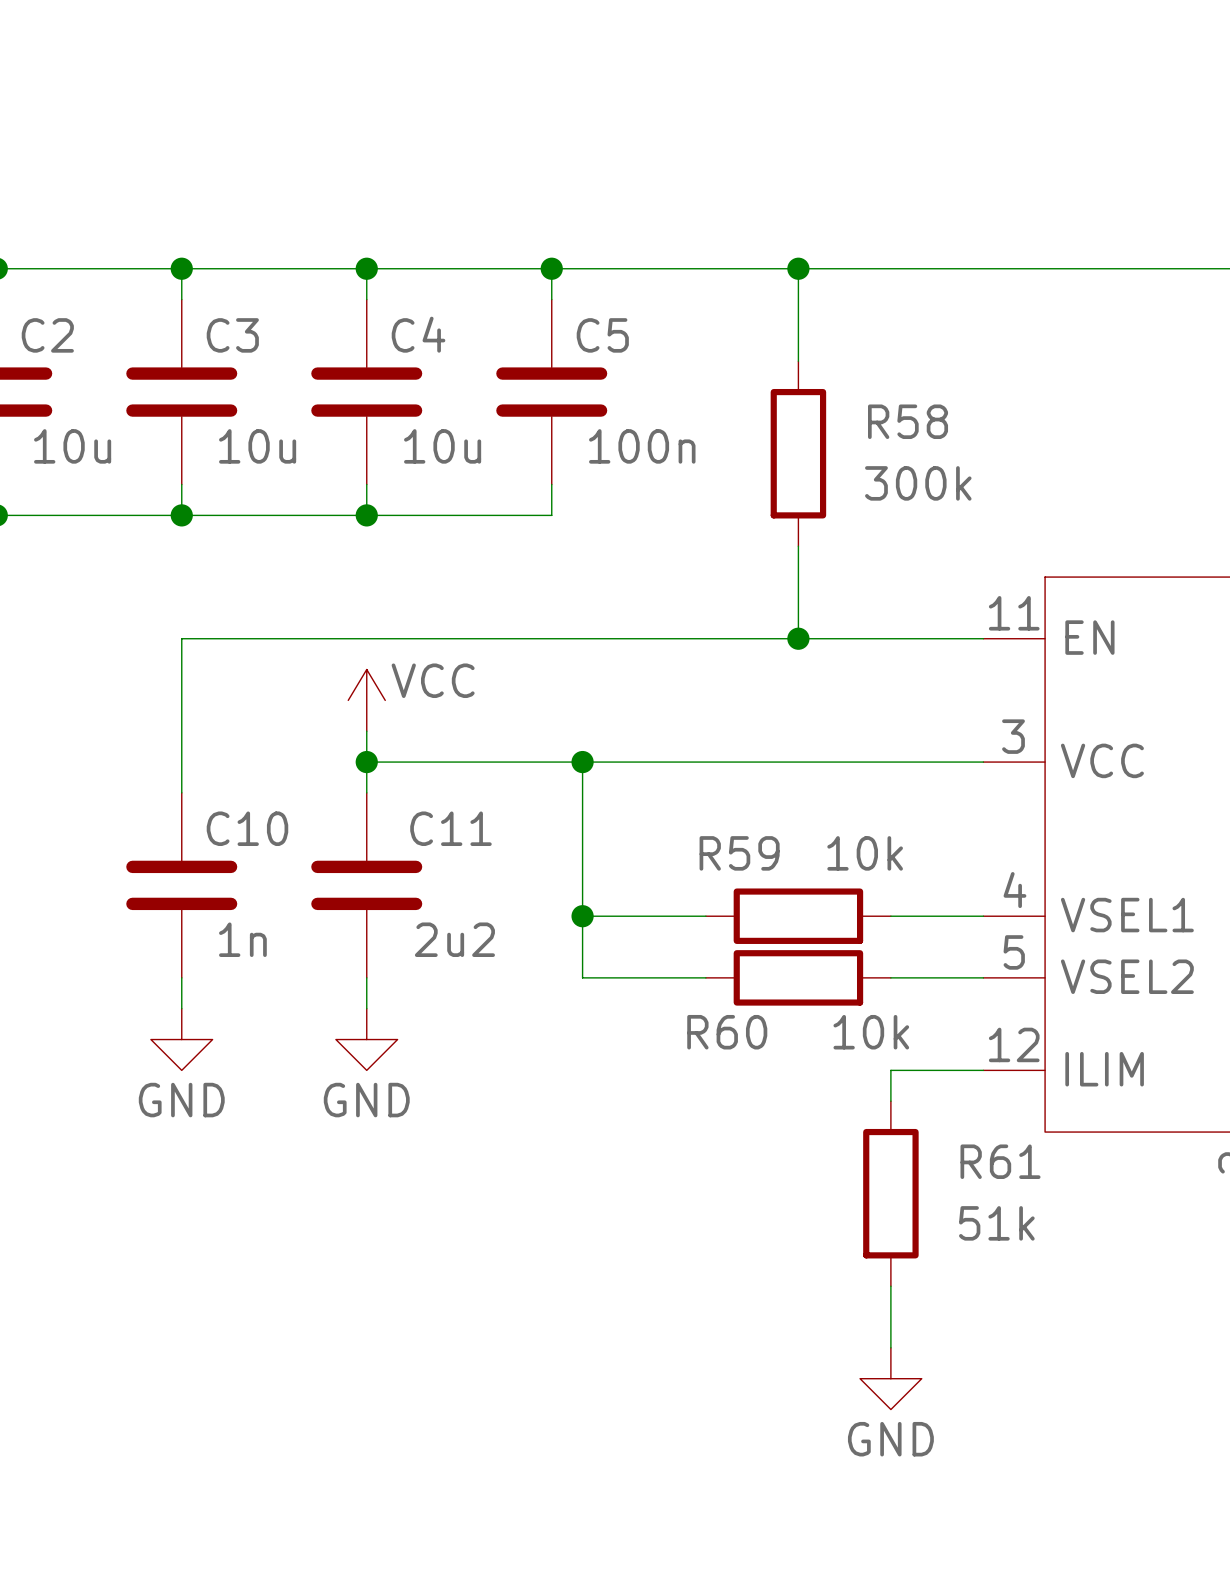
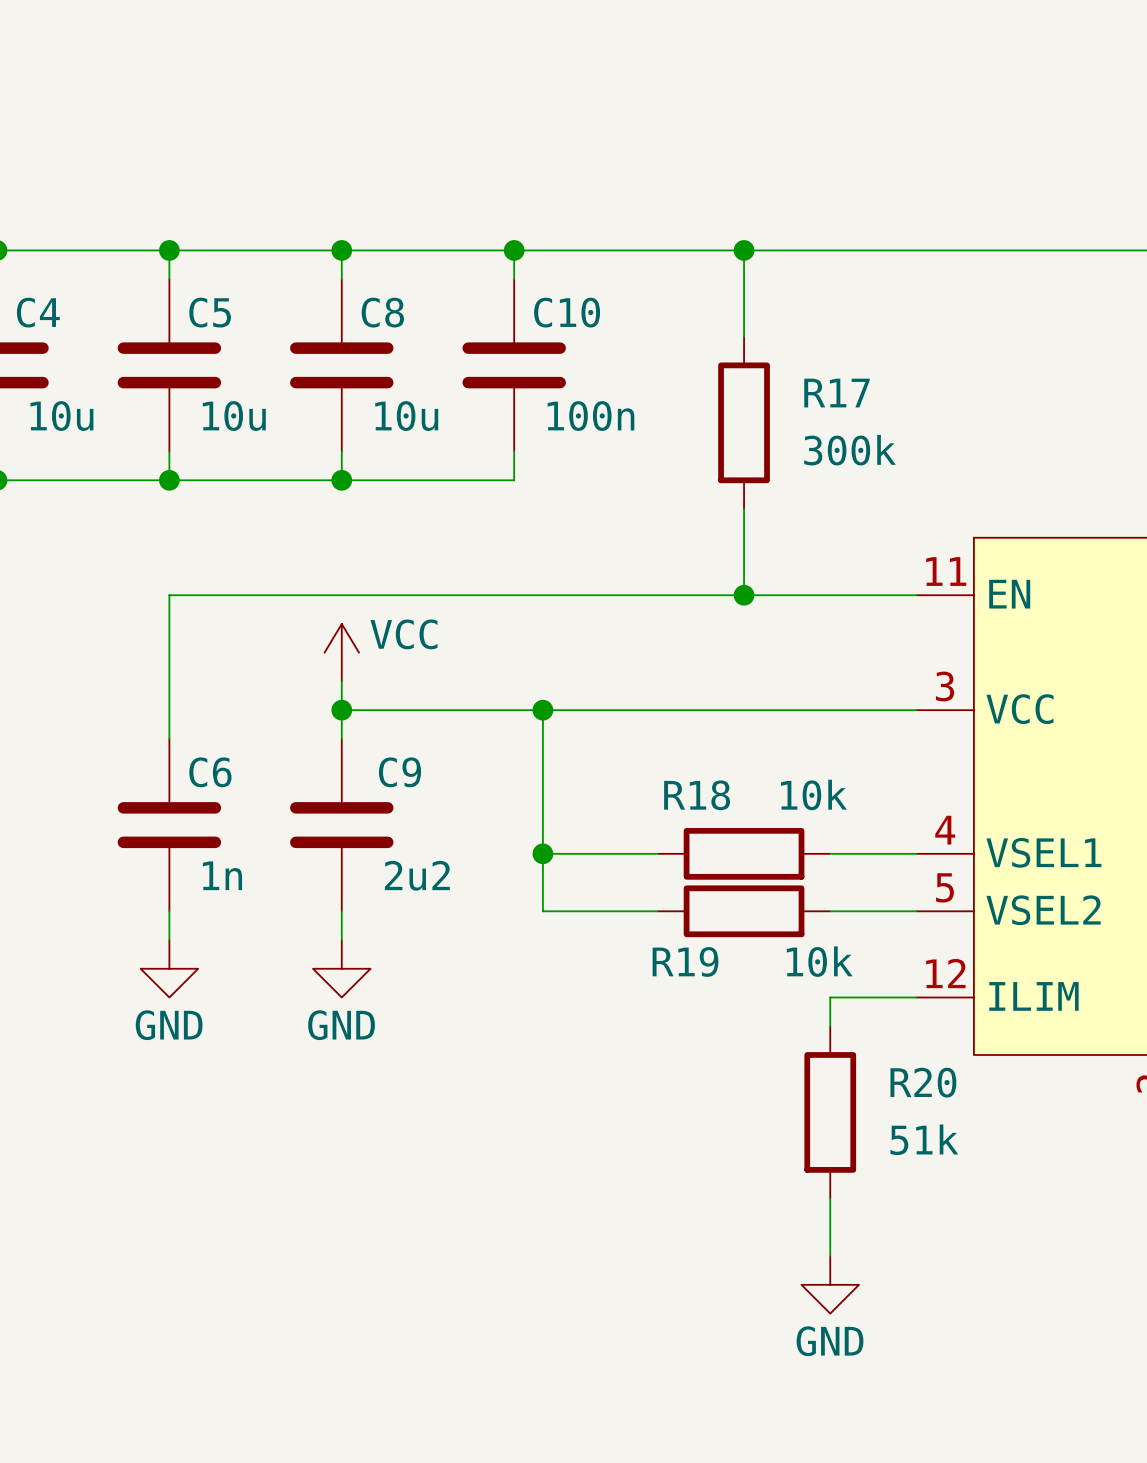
C4 name: C4 (418, 334) -> C8 (382, 312)
C2 name: C2 (47, 335) -> C4 (38, 312)
C3 name: C3 (232, 335) -> C5 (210, 312)
C5 name: C5 (602, 335) -> C10 (567, 312)
R58 name: R58 (908, 421) -> R17 (837, 393)
C10 name: C10 (247, 828) -> C6 (210, 772)
C11 name: C11 (450, 828) -> C9 (399, 772)
R59 name: R59 (739, 853) -> R18 (697, 795)
R60 name: R60 (727, 1032) -> R19 (685, 961)
R61 name: R61 (1000, 1161) -> R20 (923, 1082)

